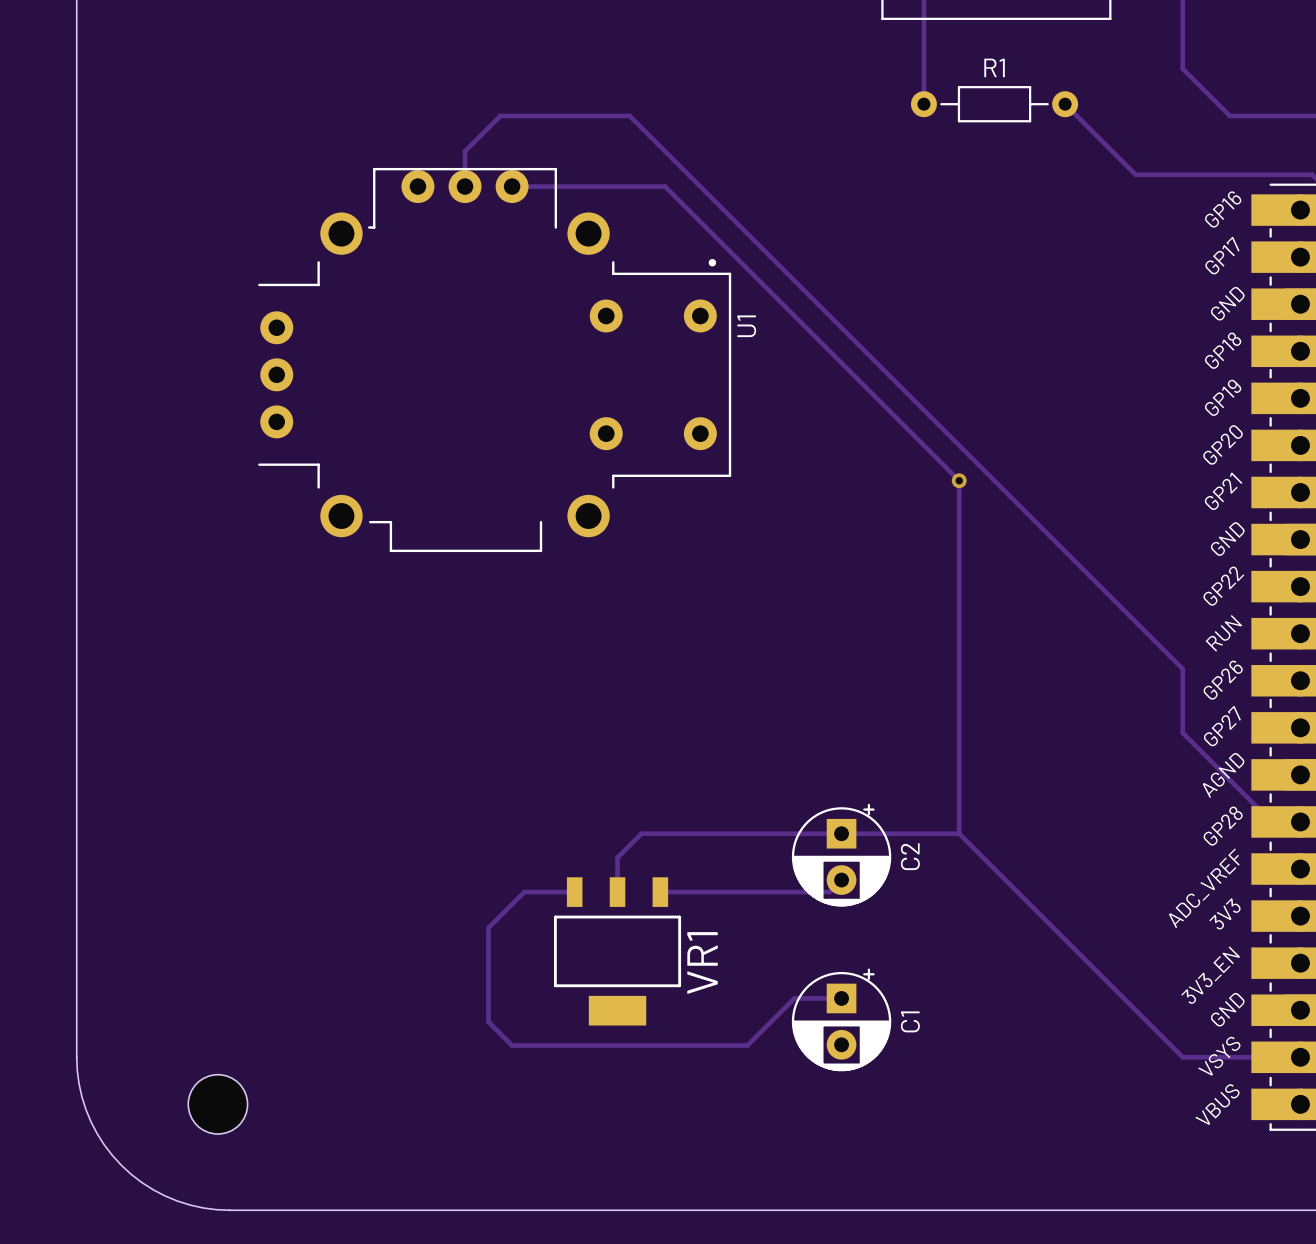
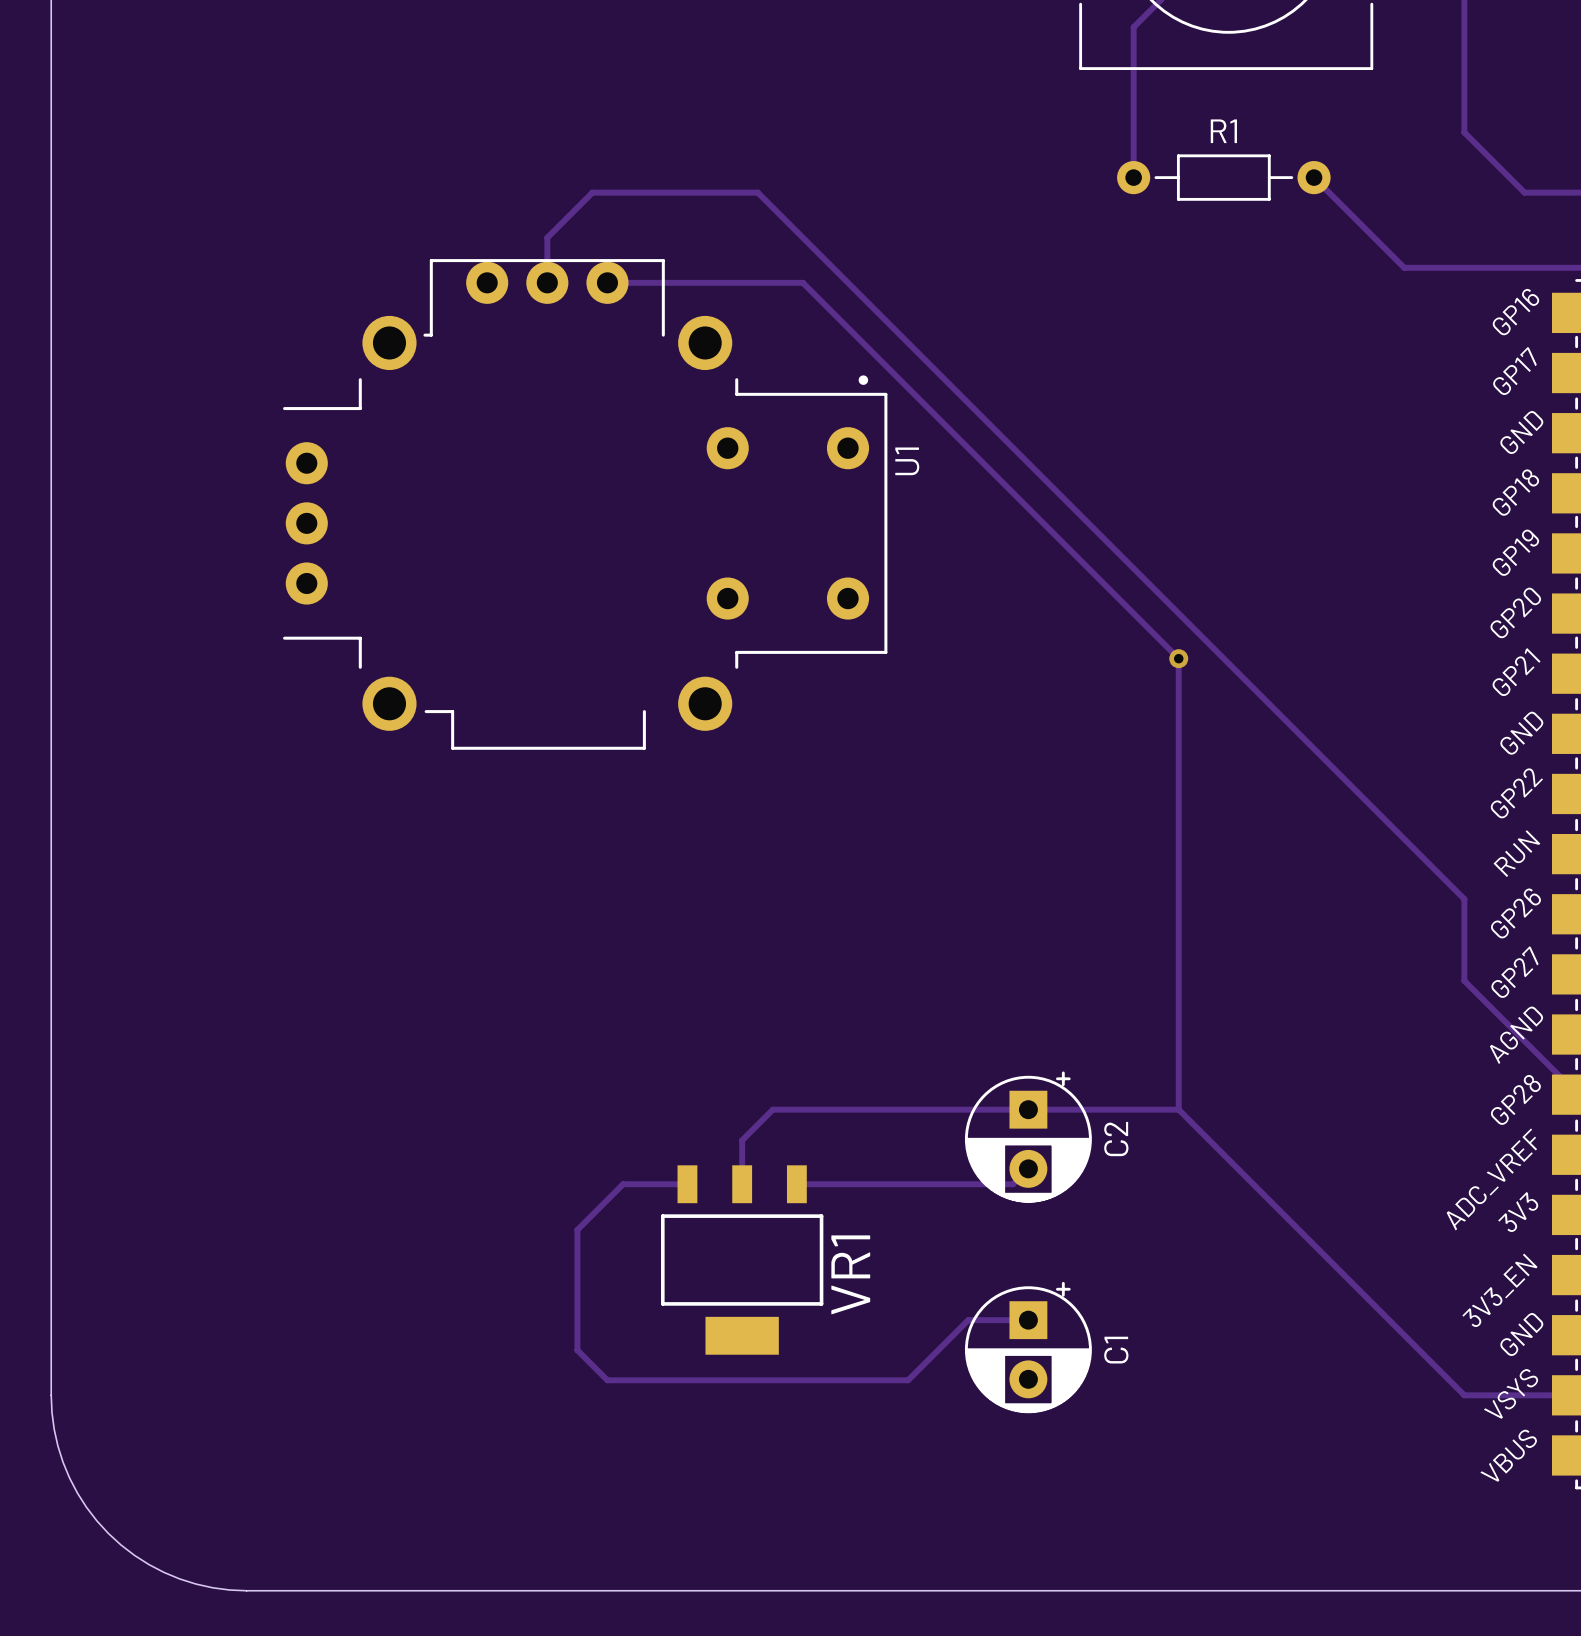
part: (217, 1104) -> none

